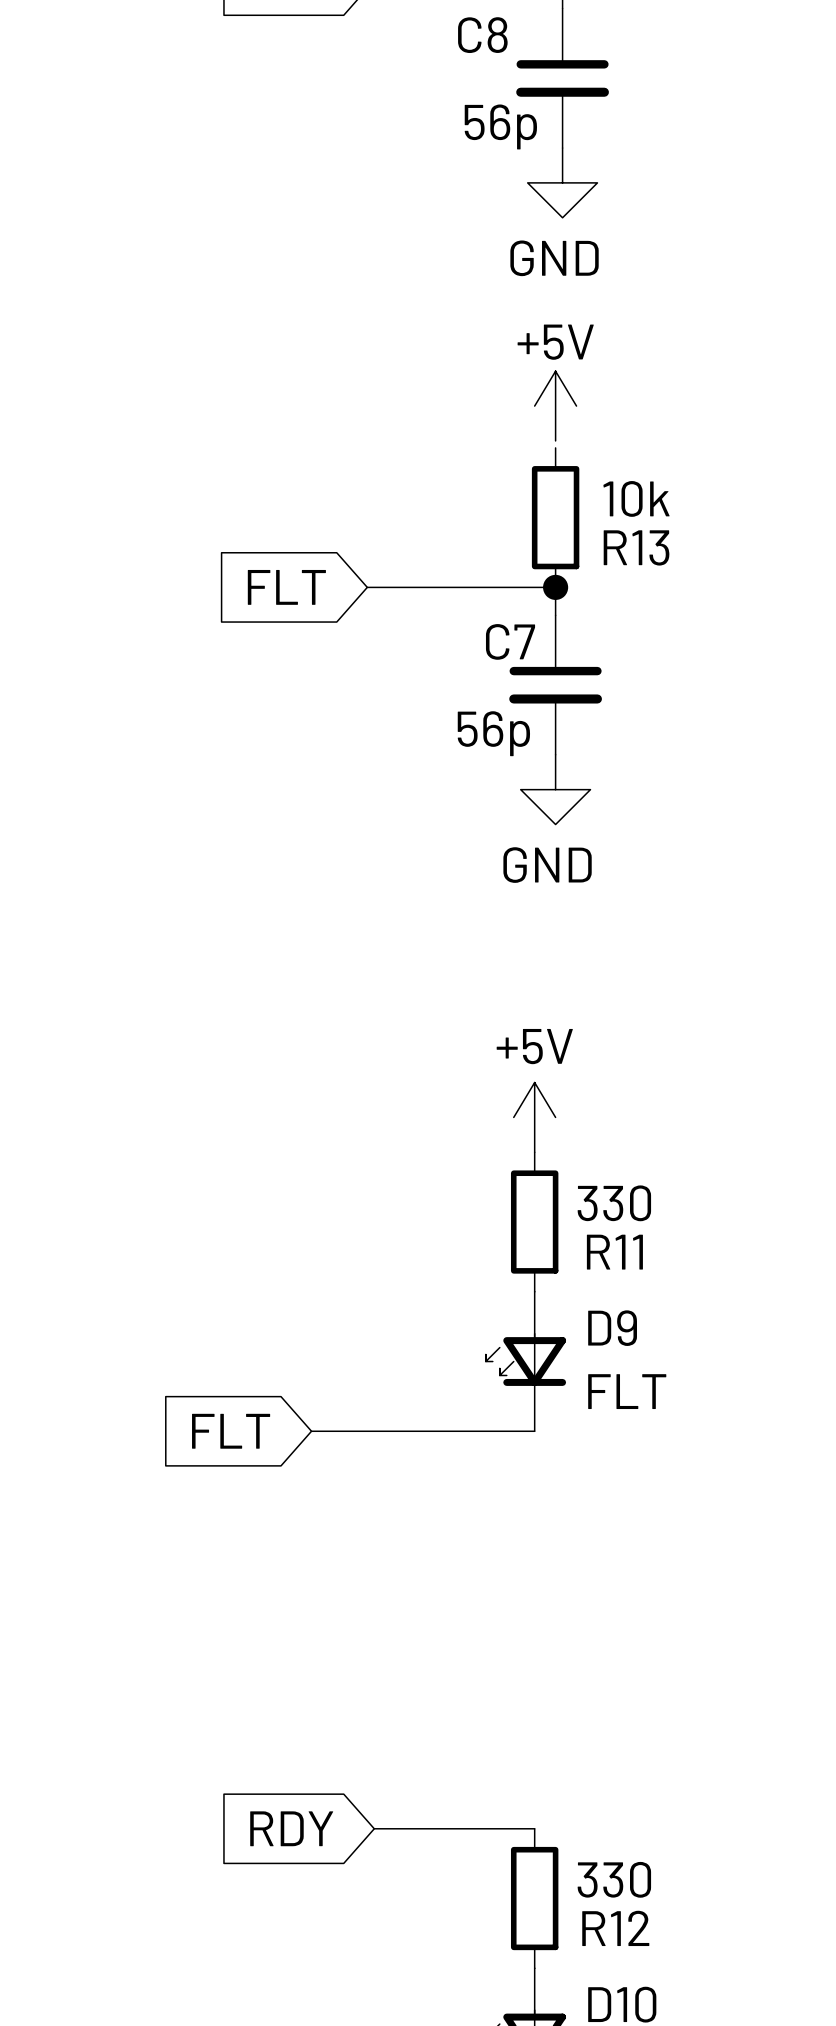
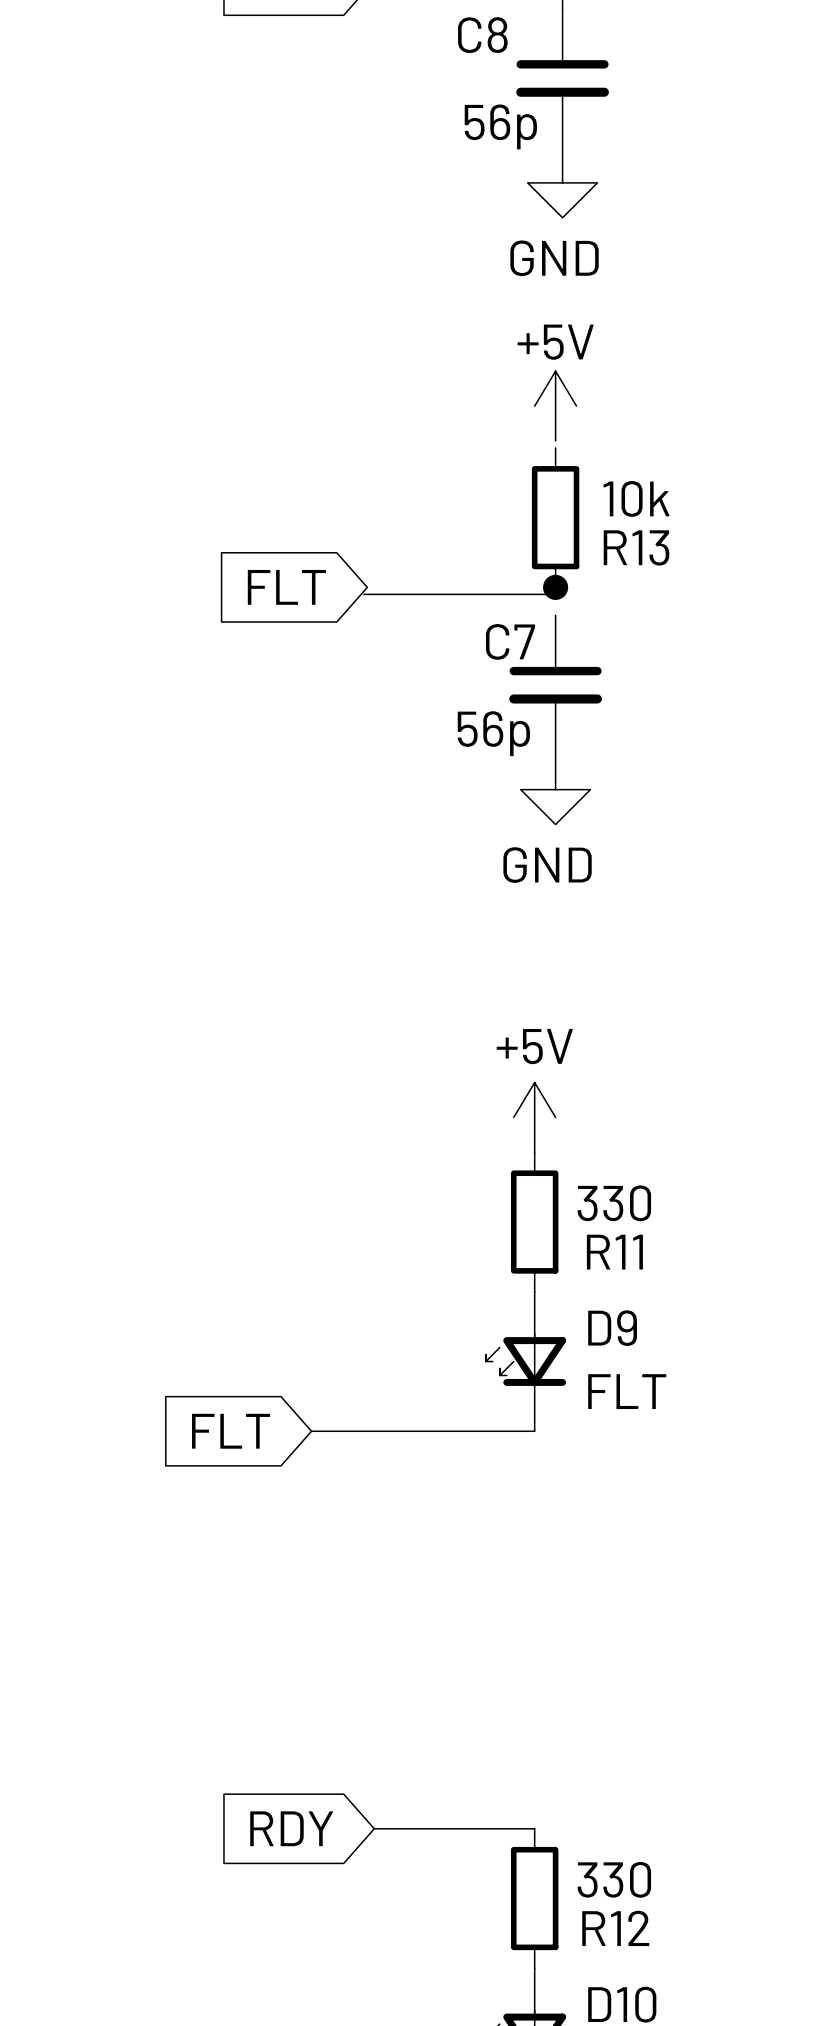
wire: (367, 587) (555, 587) (555, 615) -> none
wire: none -> (363, 594) (552, 594)

